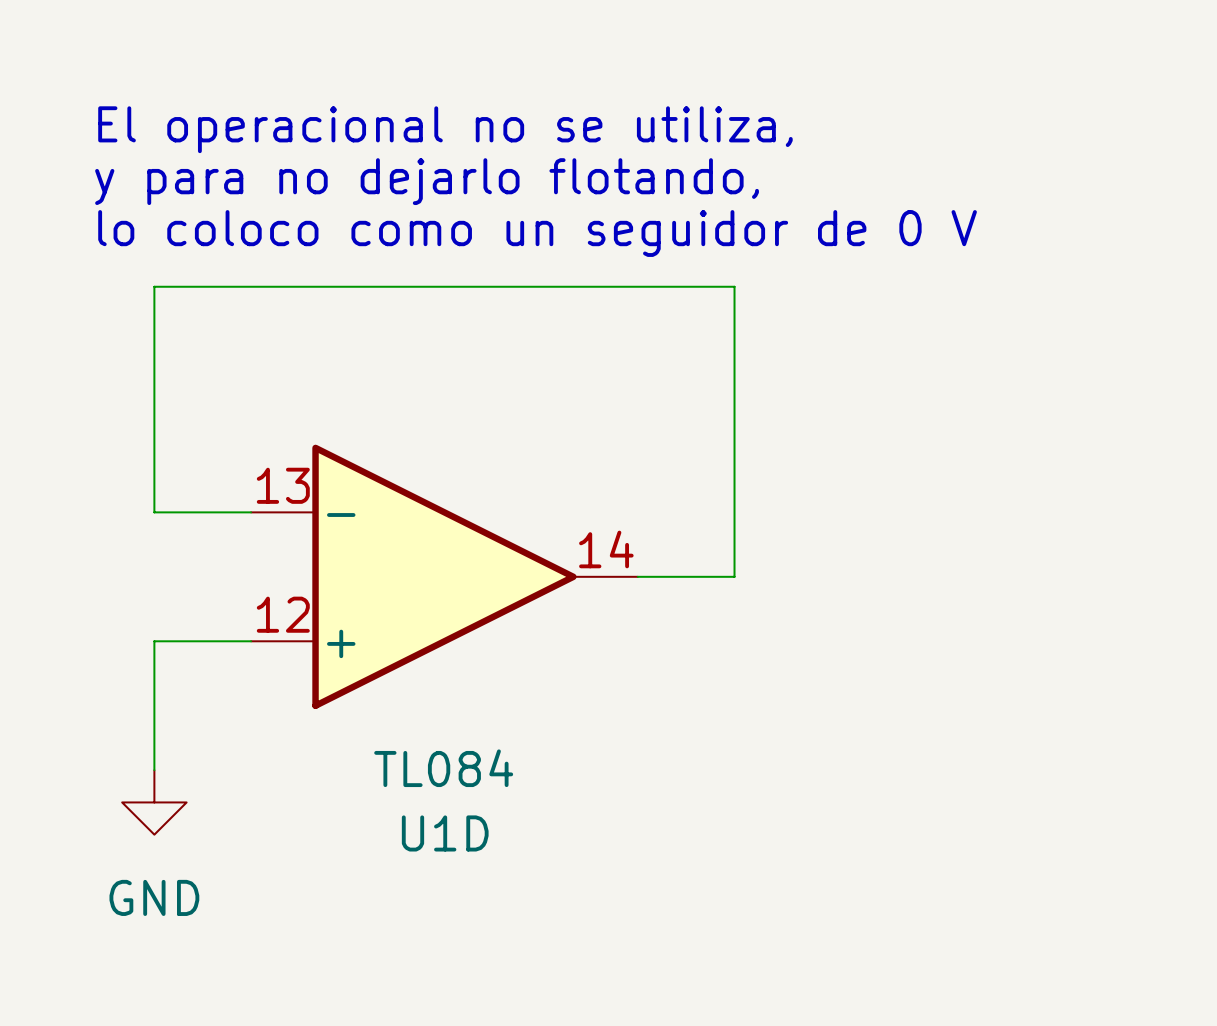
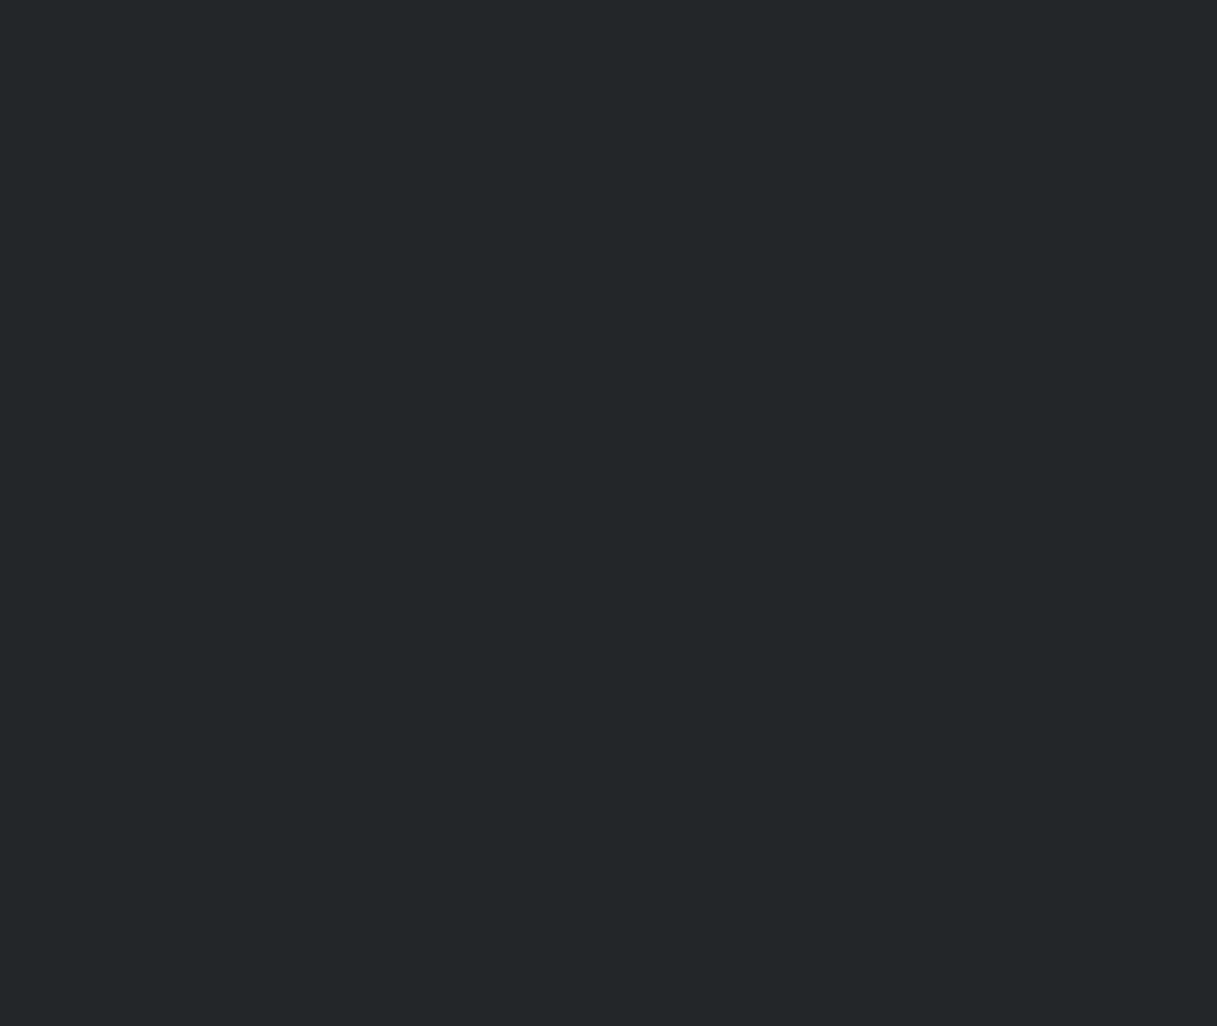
text: El operacional no se utiliza, (445, 129) -> none
text: y para no dejarlo flotando, (427, 181) -> none
text: lo coloco como un seguidor de 0 V (537, 233) -> none
wire: (251, 512) (154, 512) (154, 286) (734, 286) (734, 576) (637, 576) -> none
U1D: TL084 (444, 576) -> none
wire: (251, 641) (154, 641) (154, 770) -> none
power symbol: GND (154, 802) -> none

